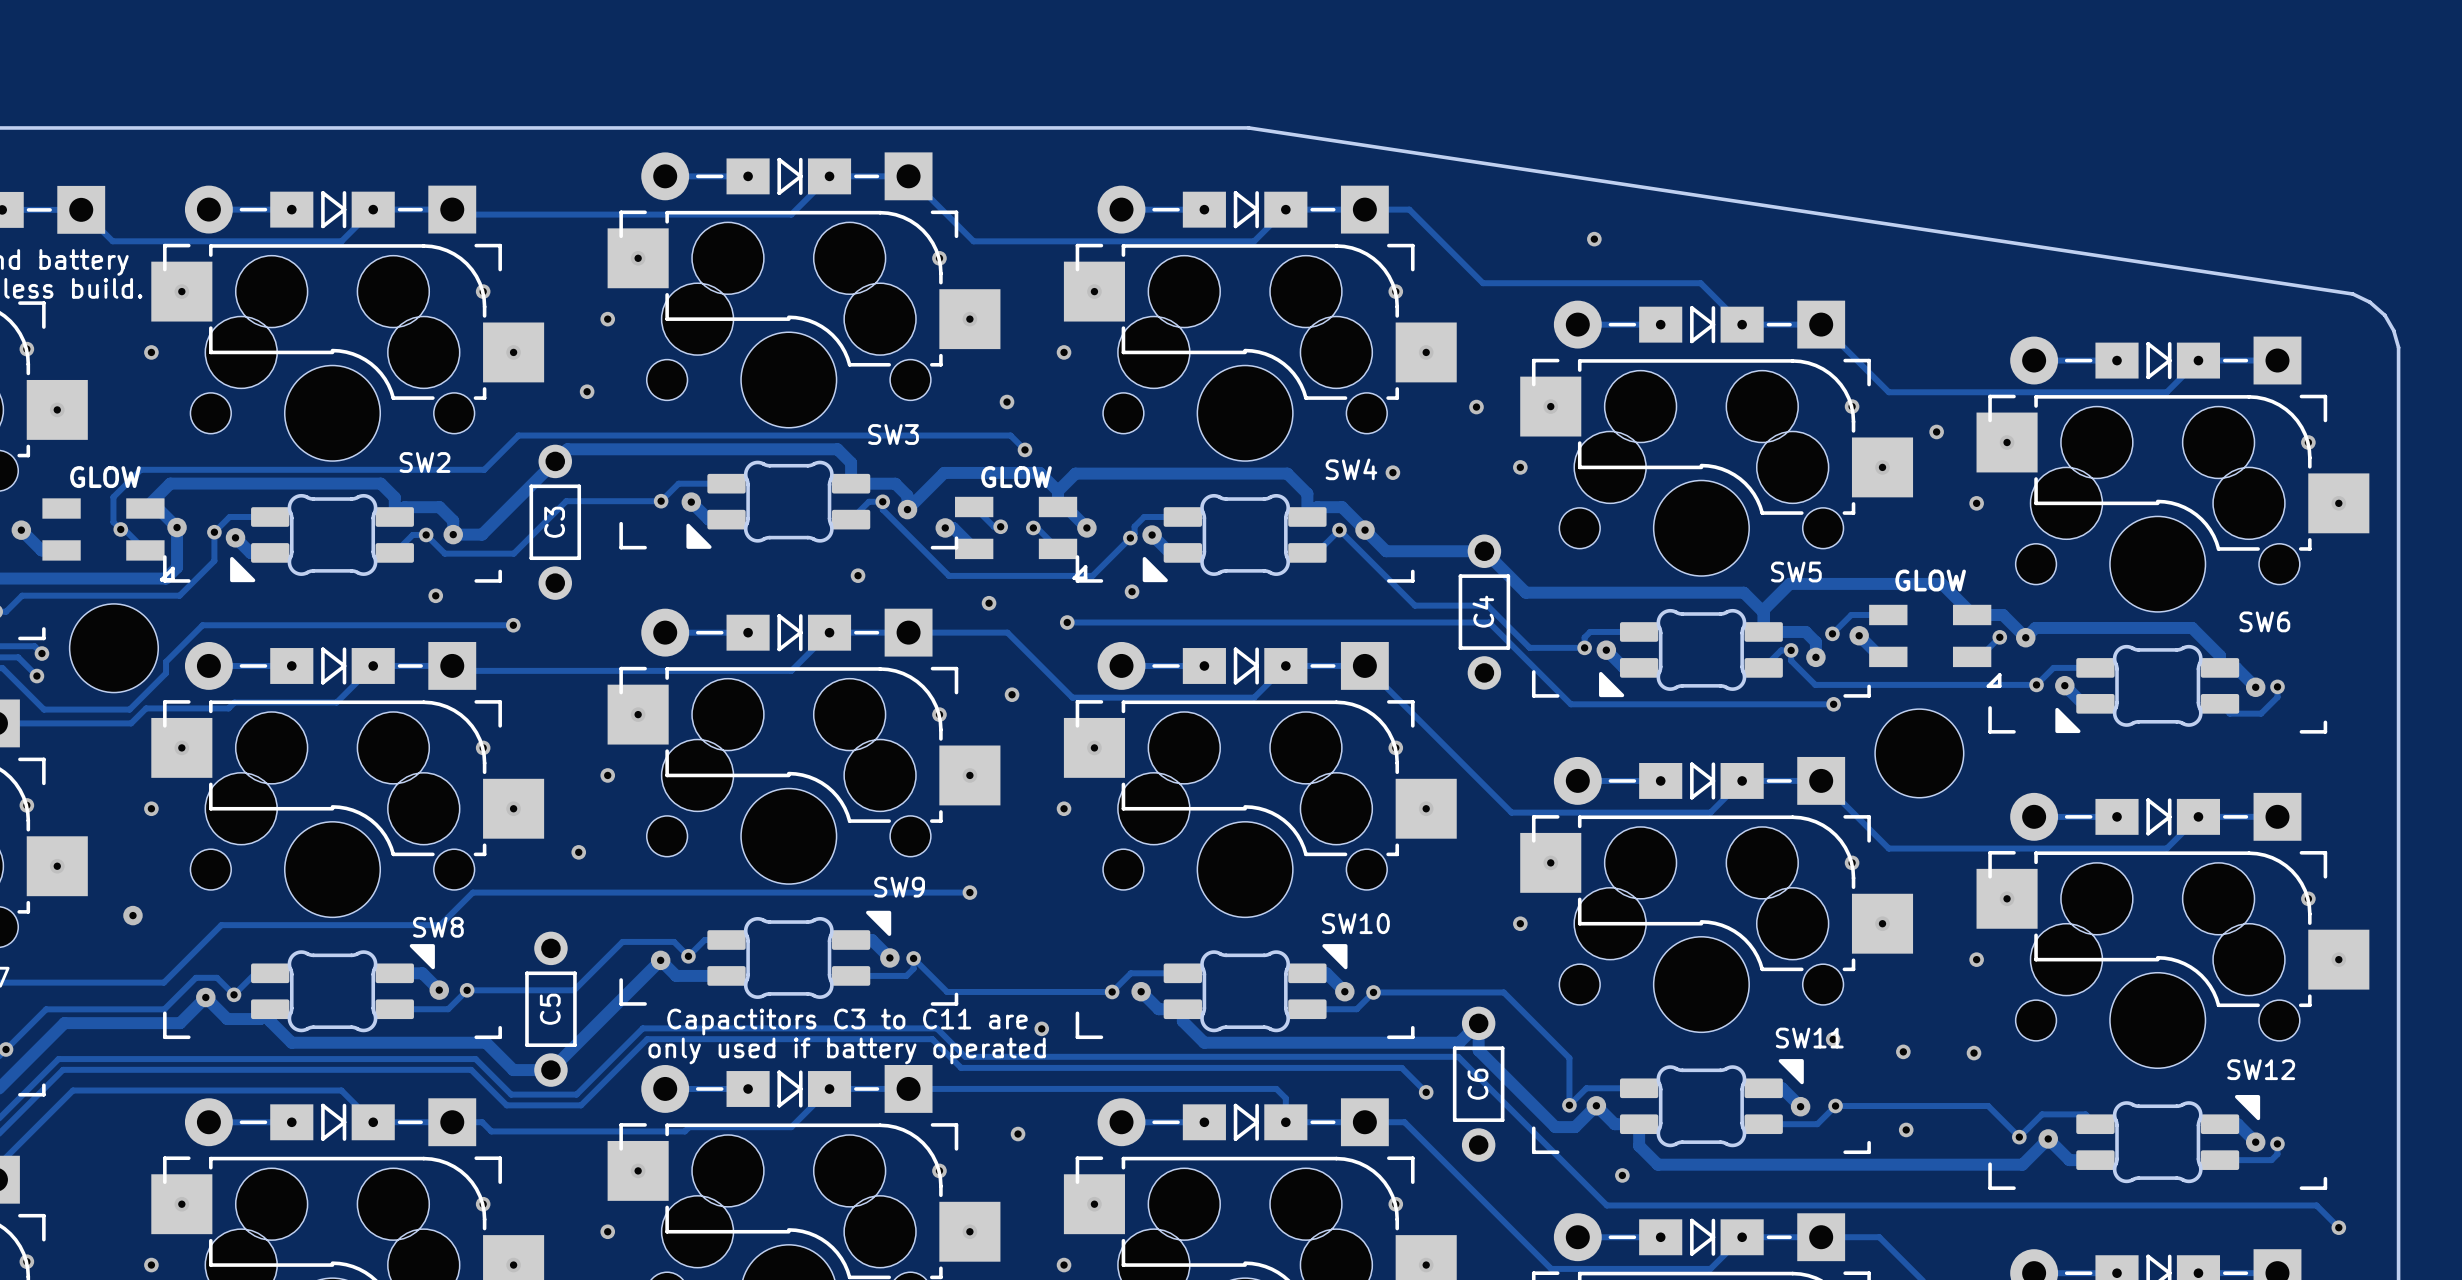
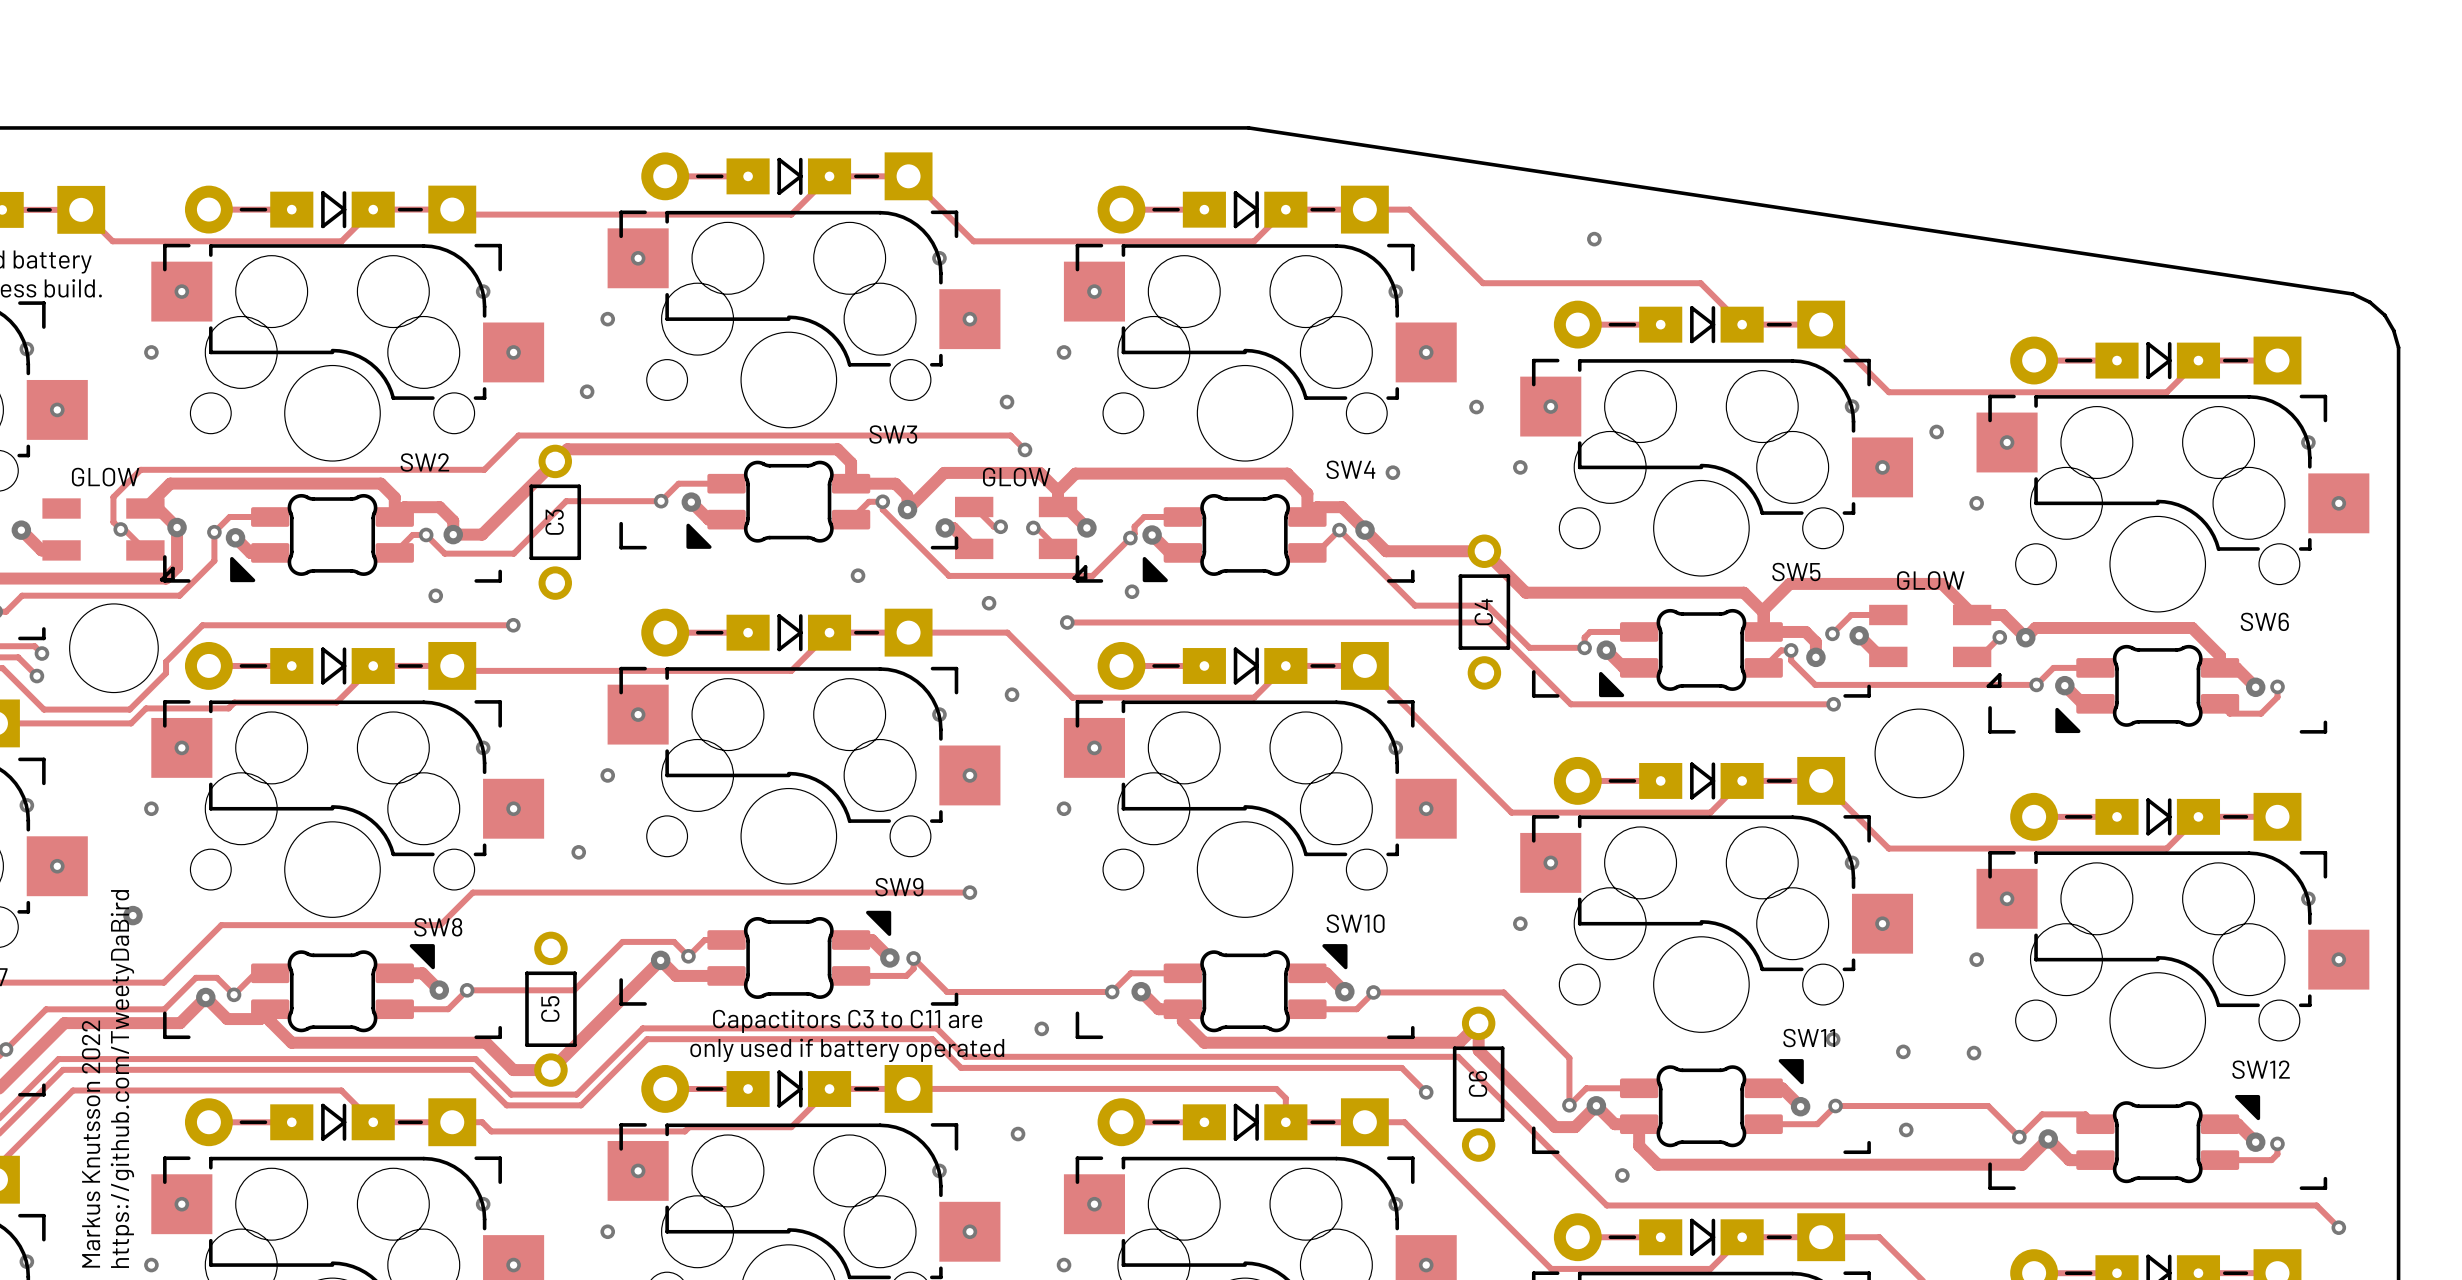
text: none -> https://github.com/TweetyDaBird (122, 1079)
text: none -> Markus Knutsson 2022 (91, 1144)

